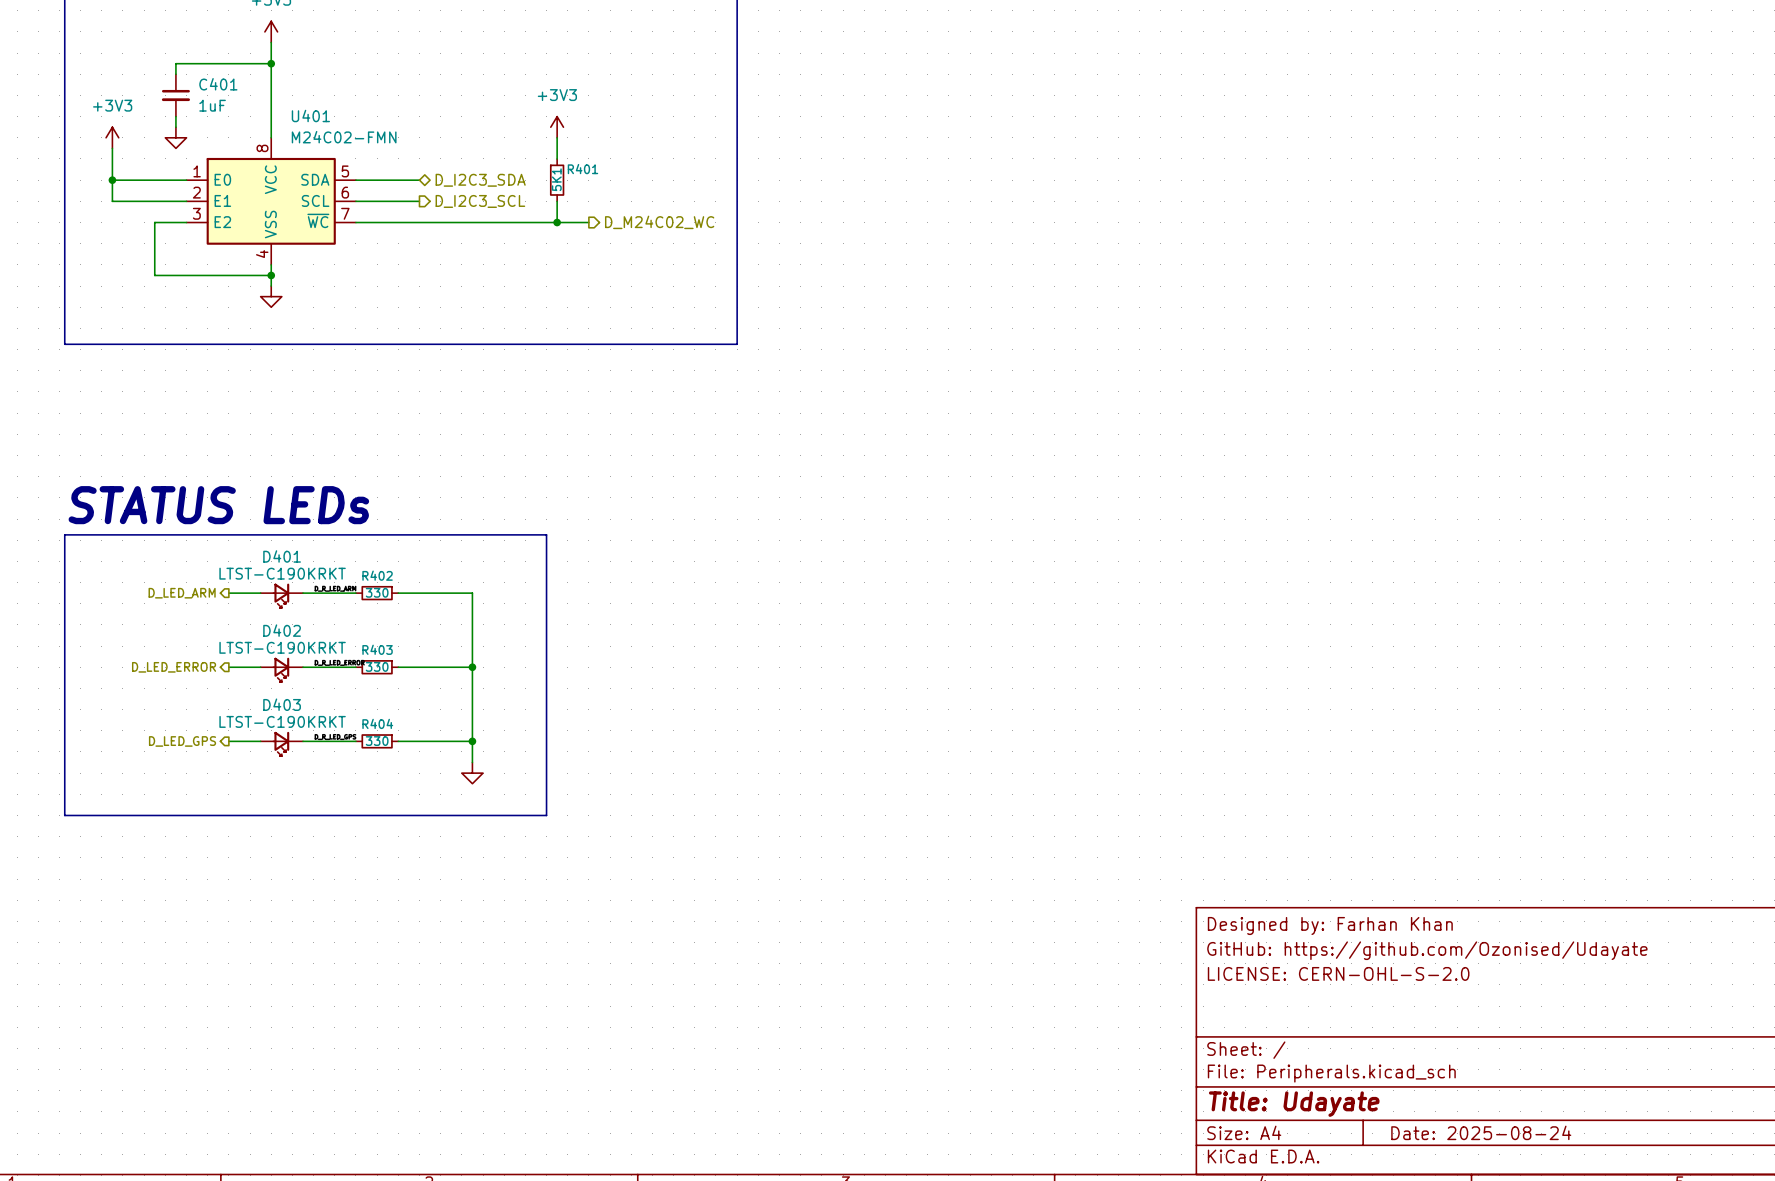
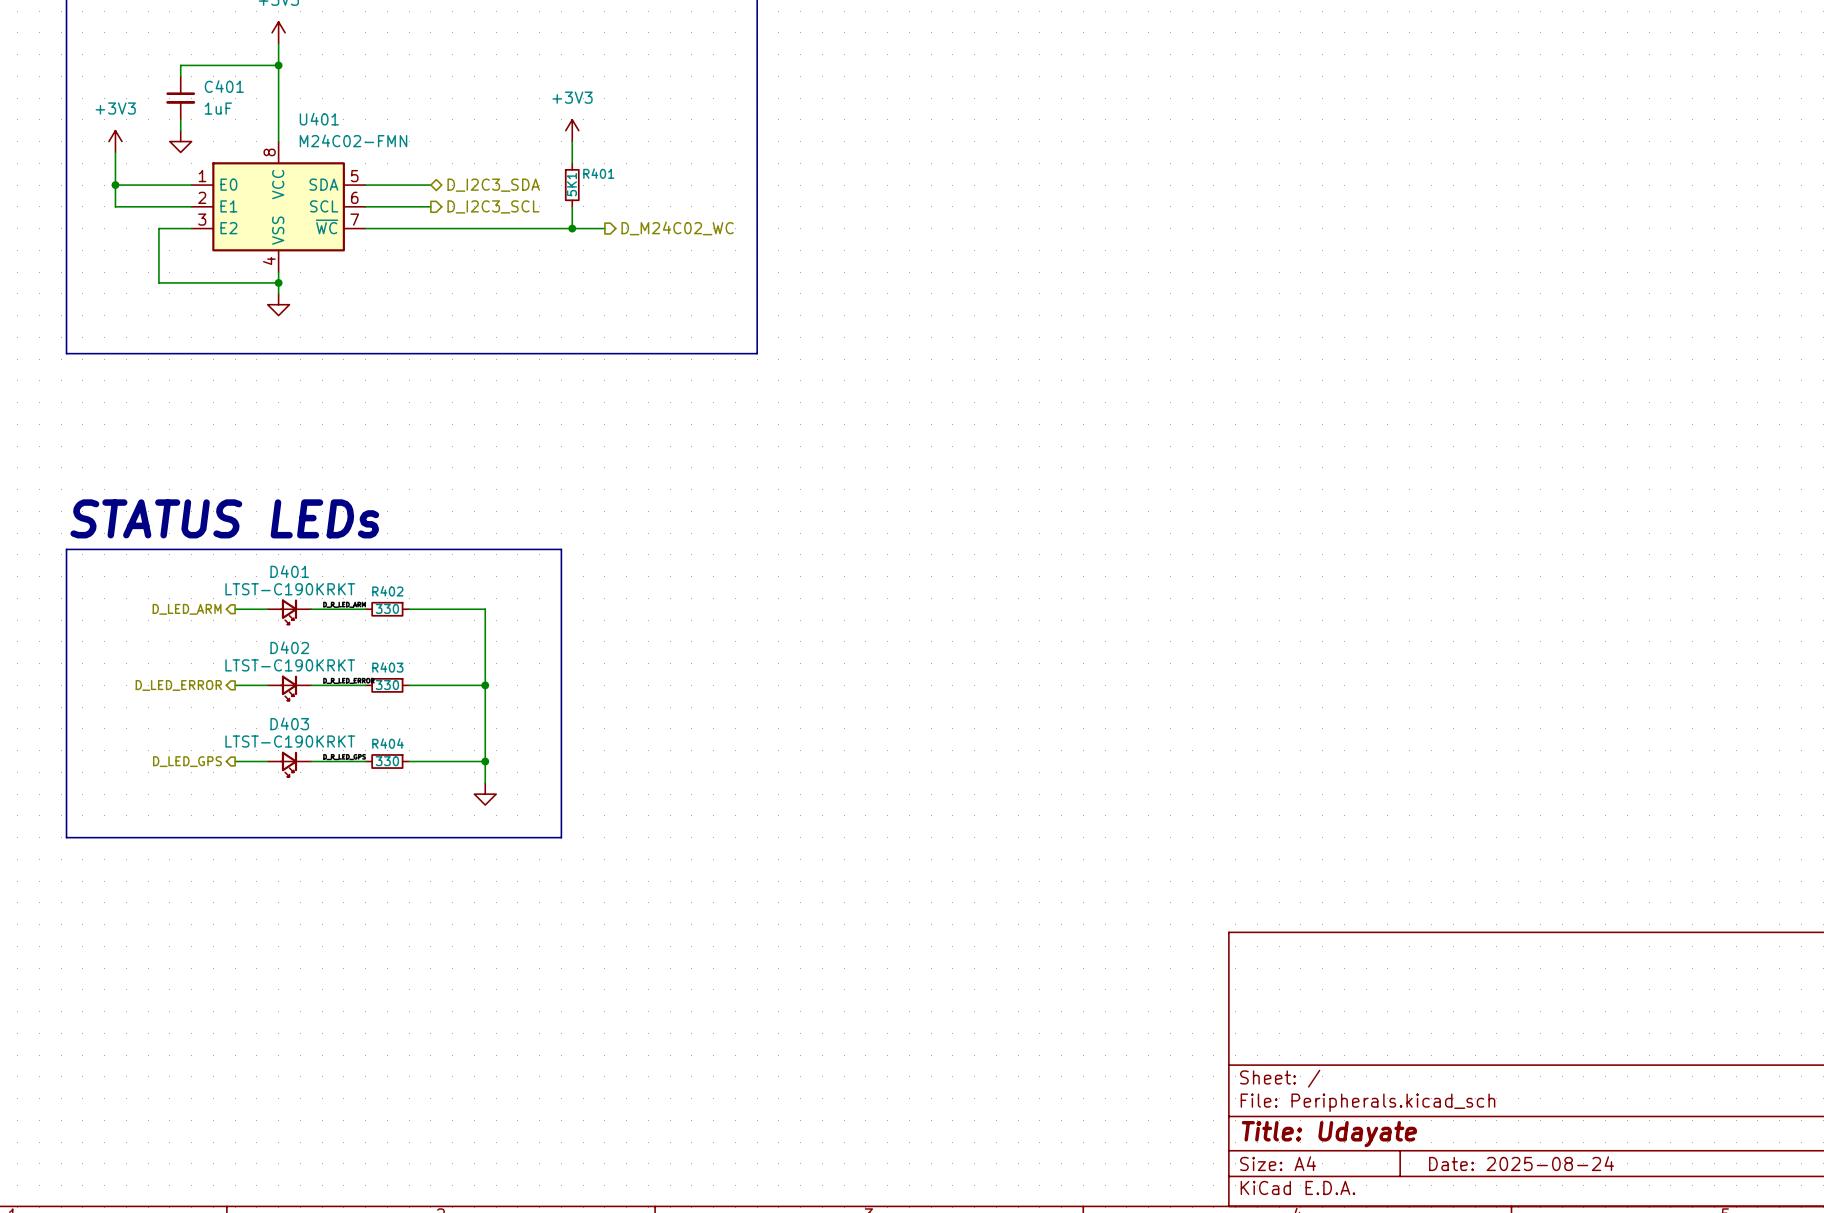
title block: Designed by: Farhan Khan (1330, 925) -> none
title block: GitHub: https://github.com/Ozonised/Udayate (1427, 950) -> none
title block: LICENSE: CERN-OHL-S-2.0 (1338, 973) -> none

